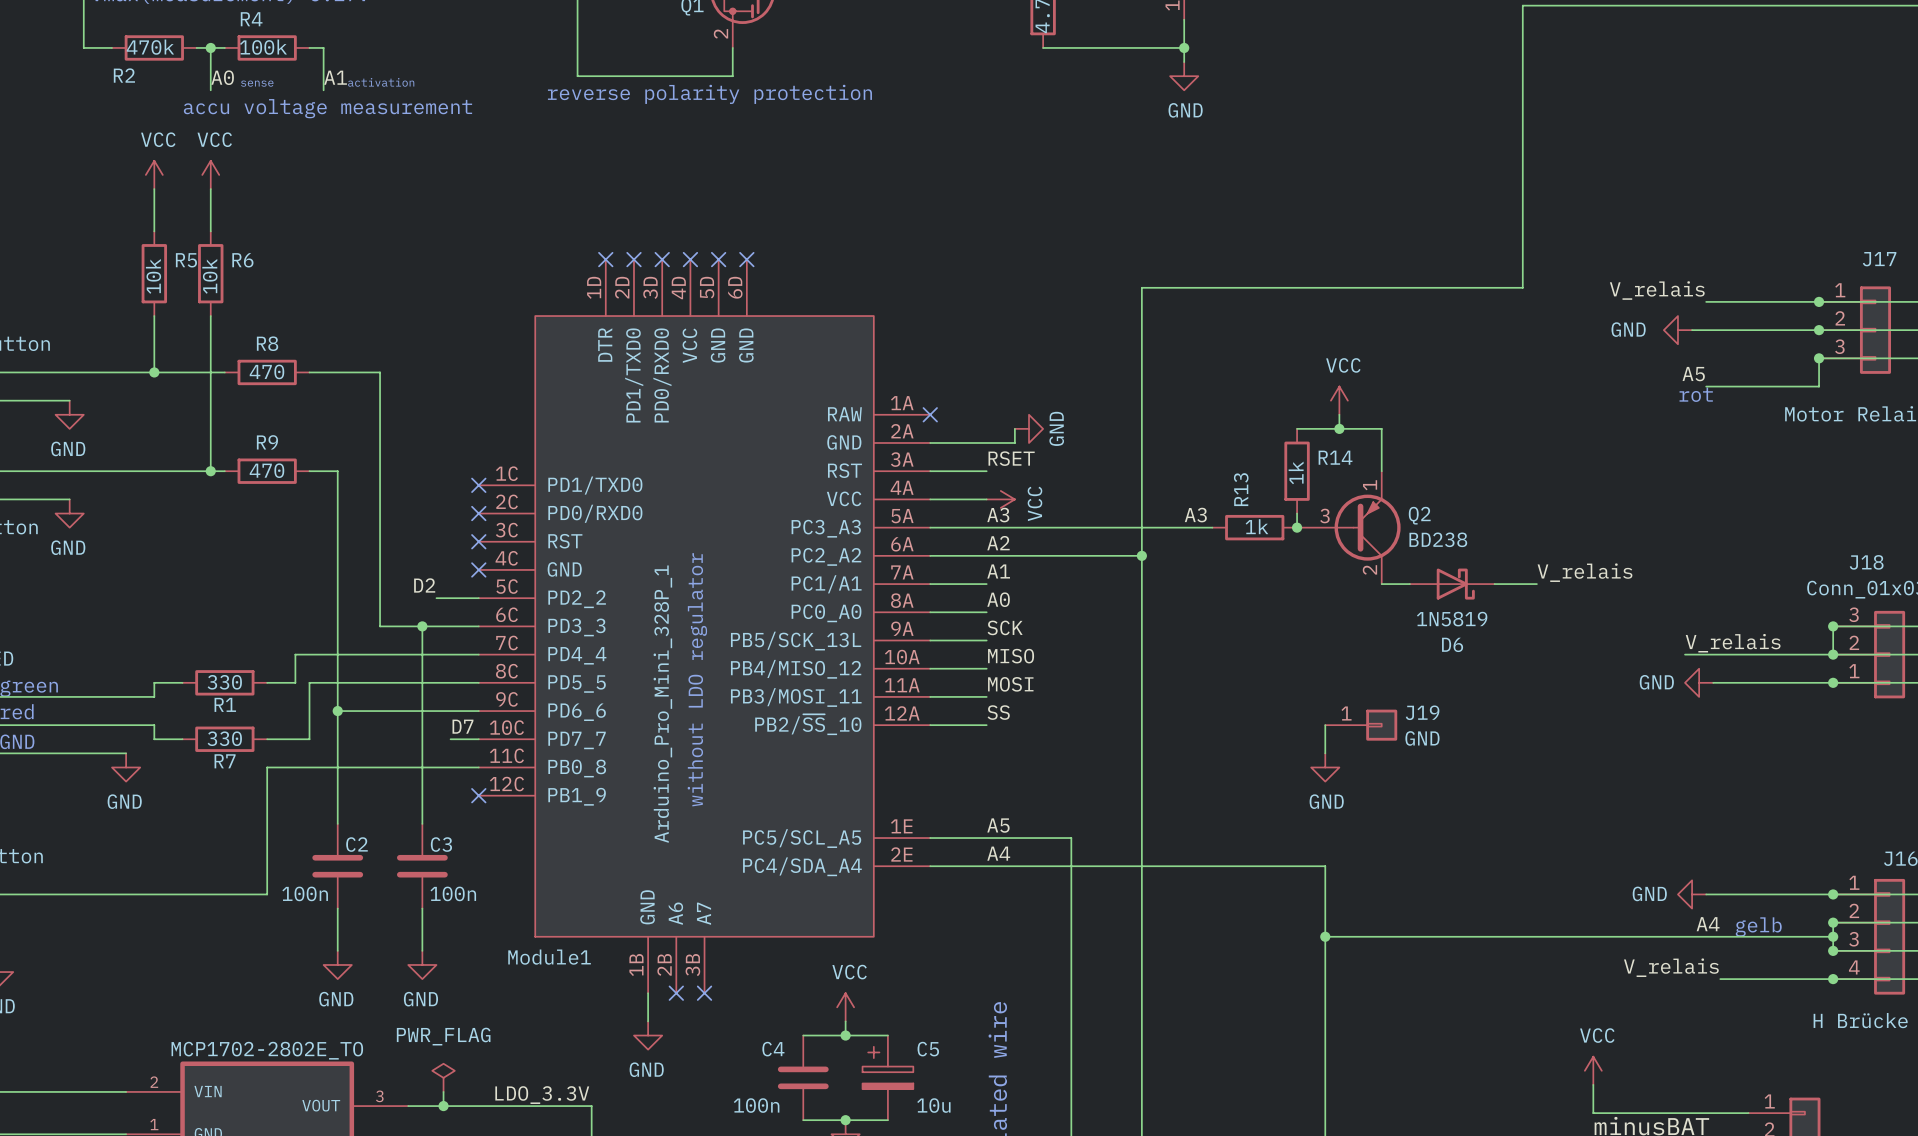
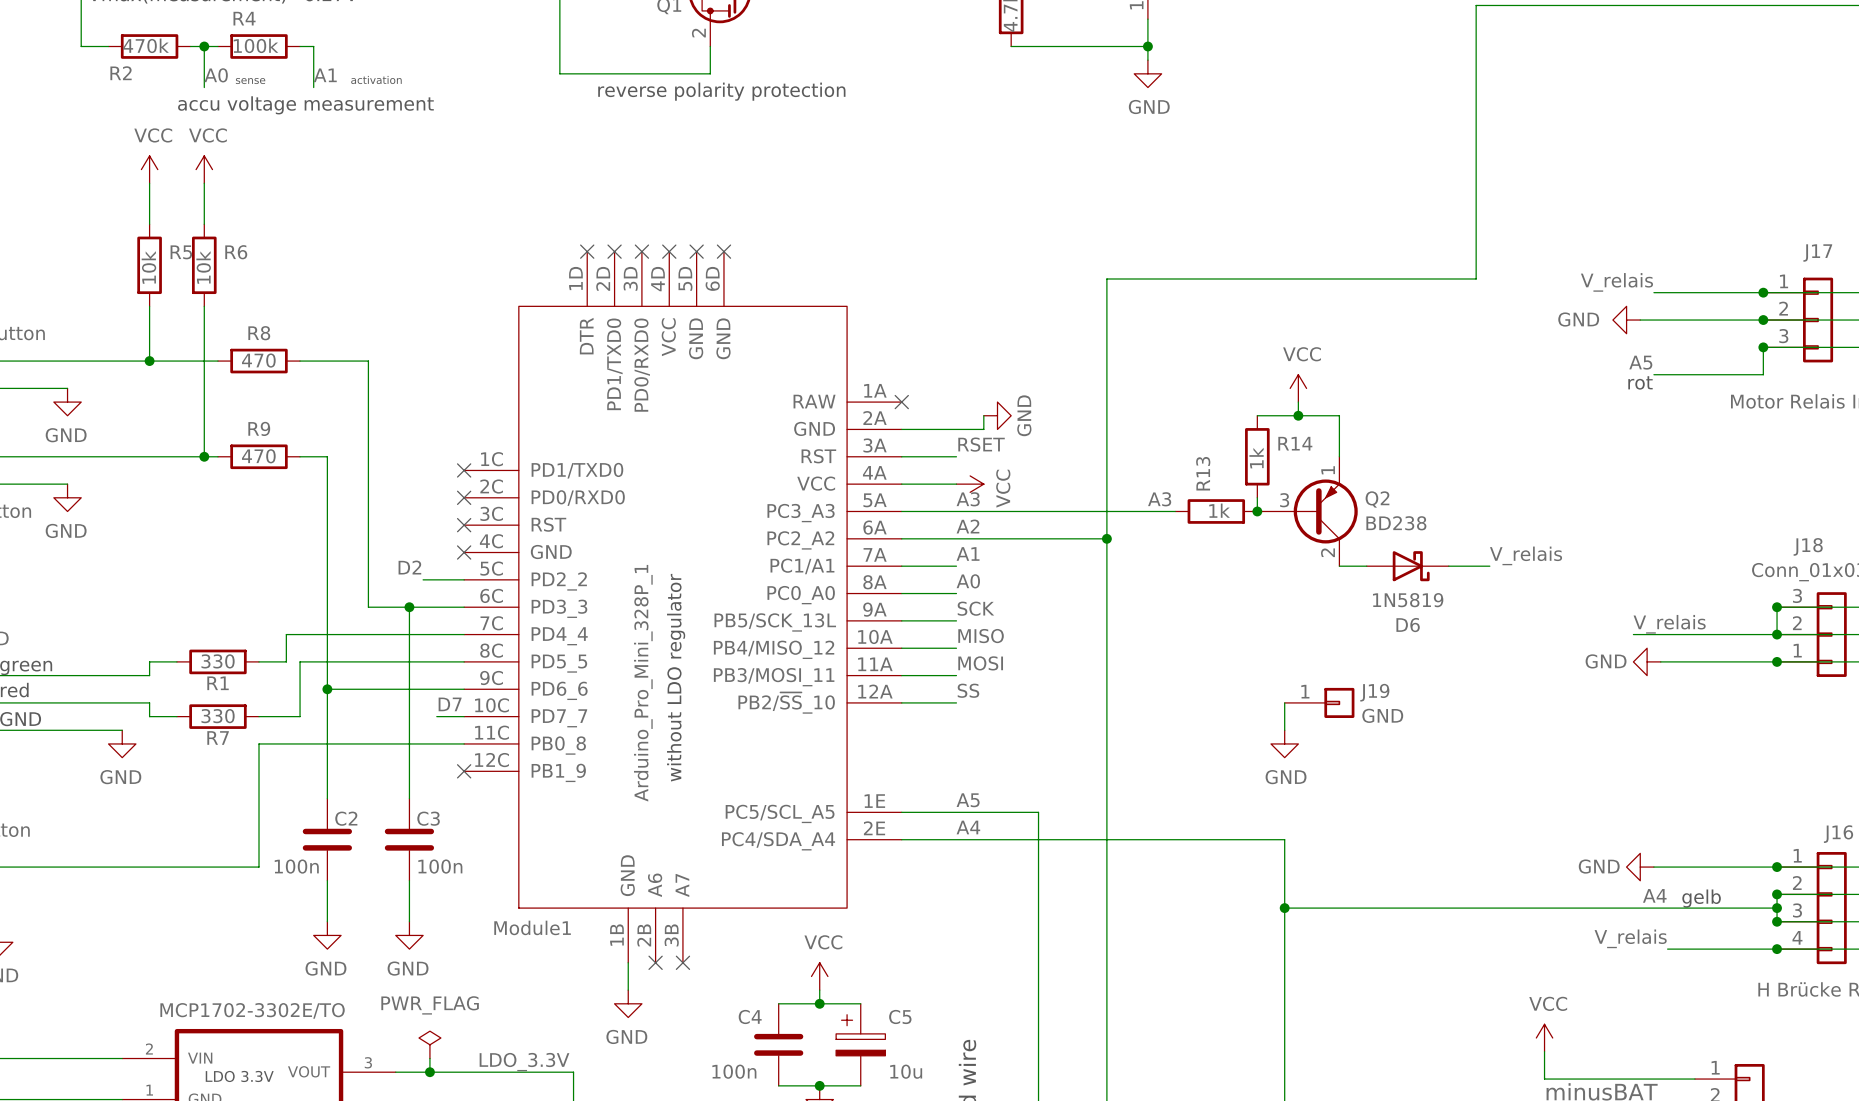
part value: MCP1702-2802E_TO (267, 1050) -> MCP1702-3302E/TO (252, 1010)
text: none -> LDO 3.3V (239, 1076)

